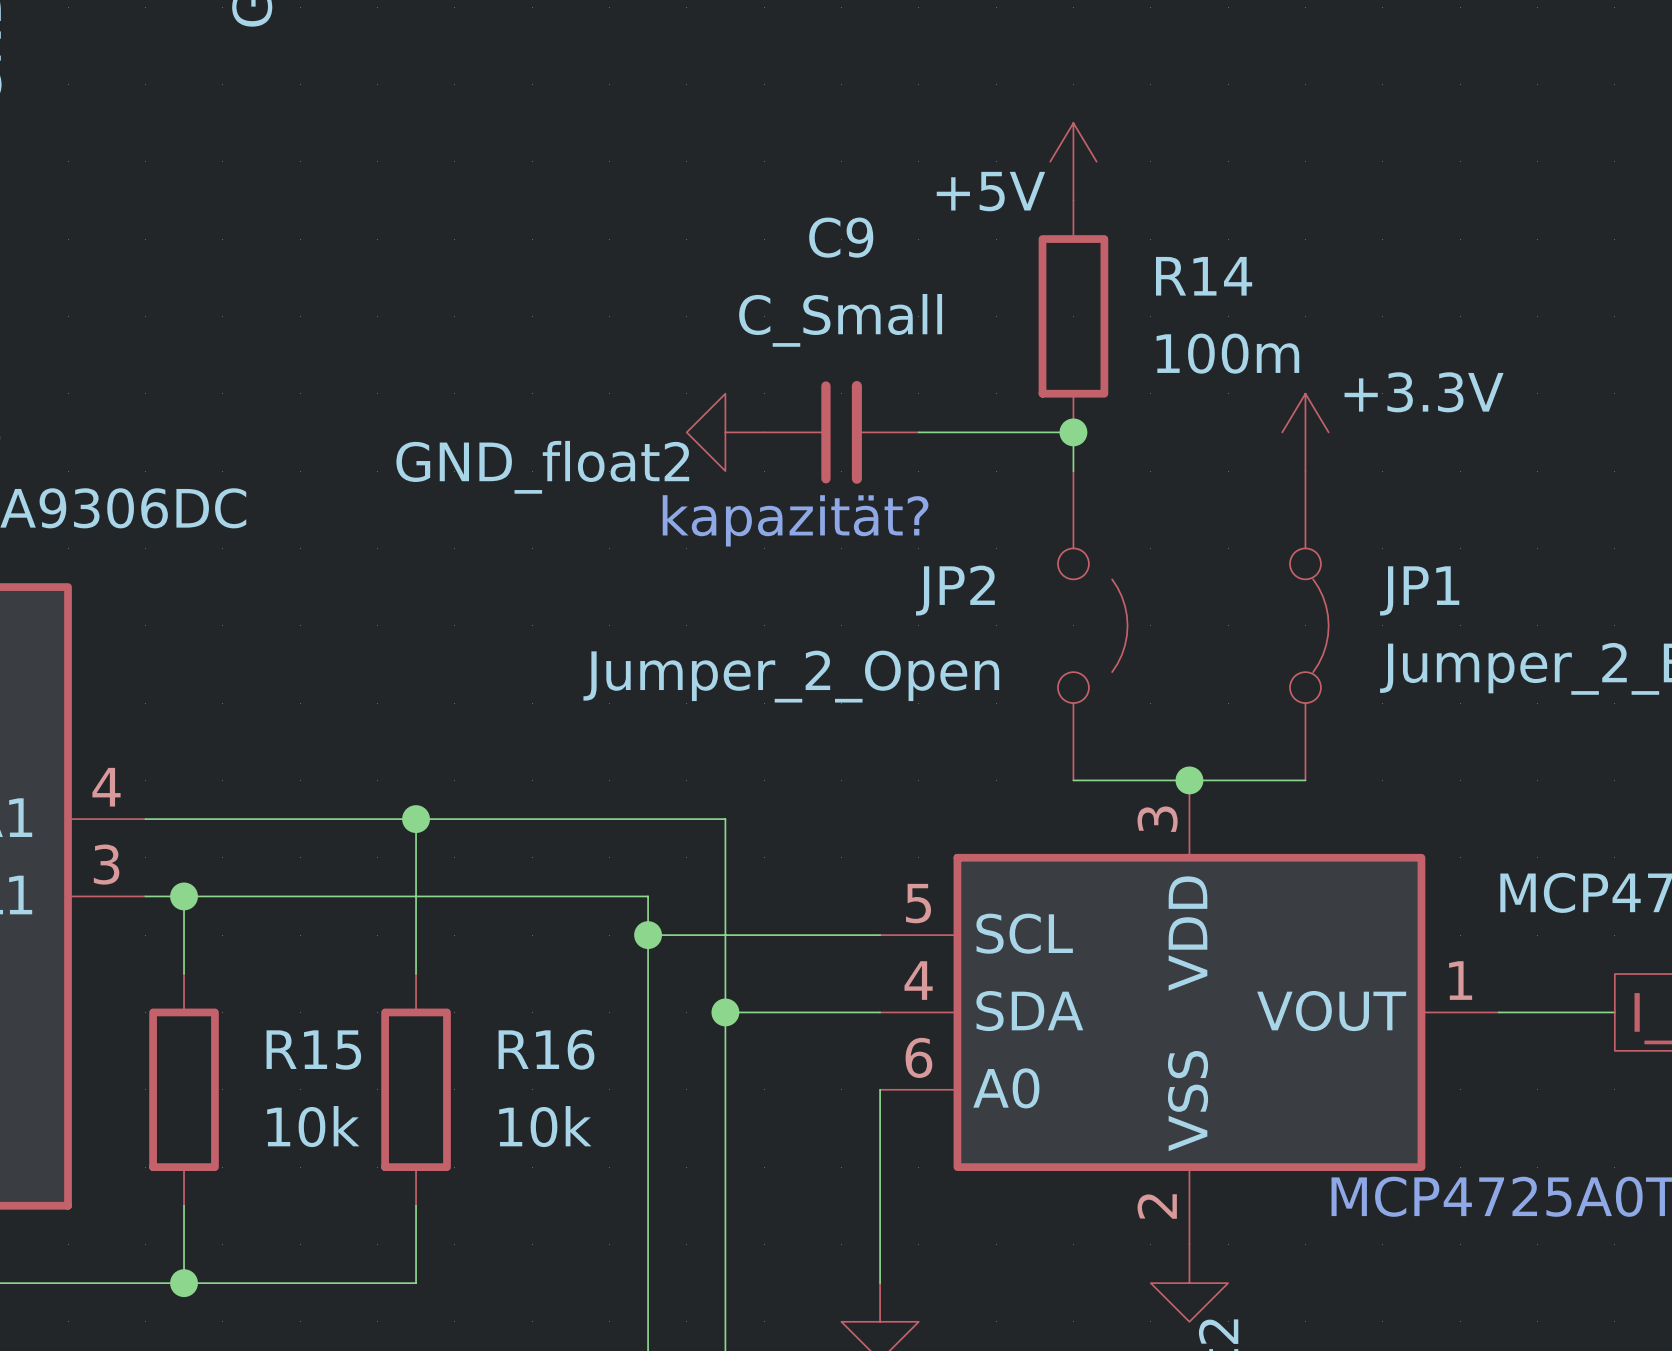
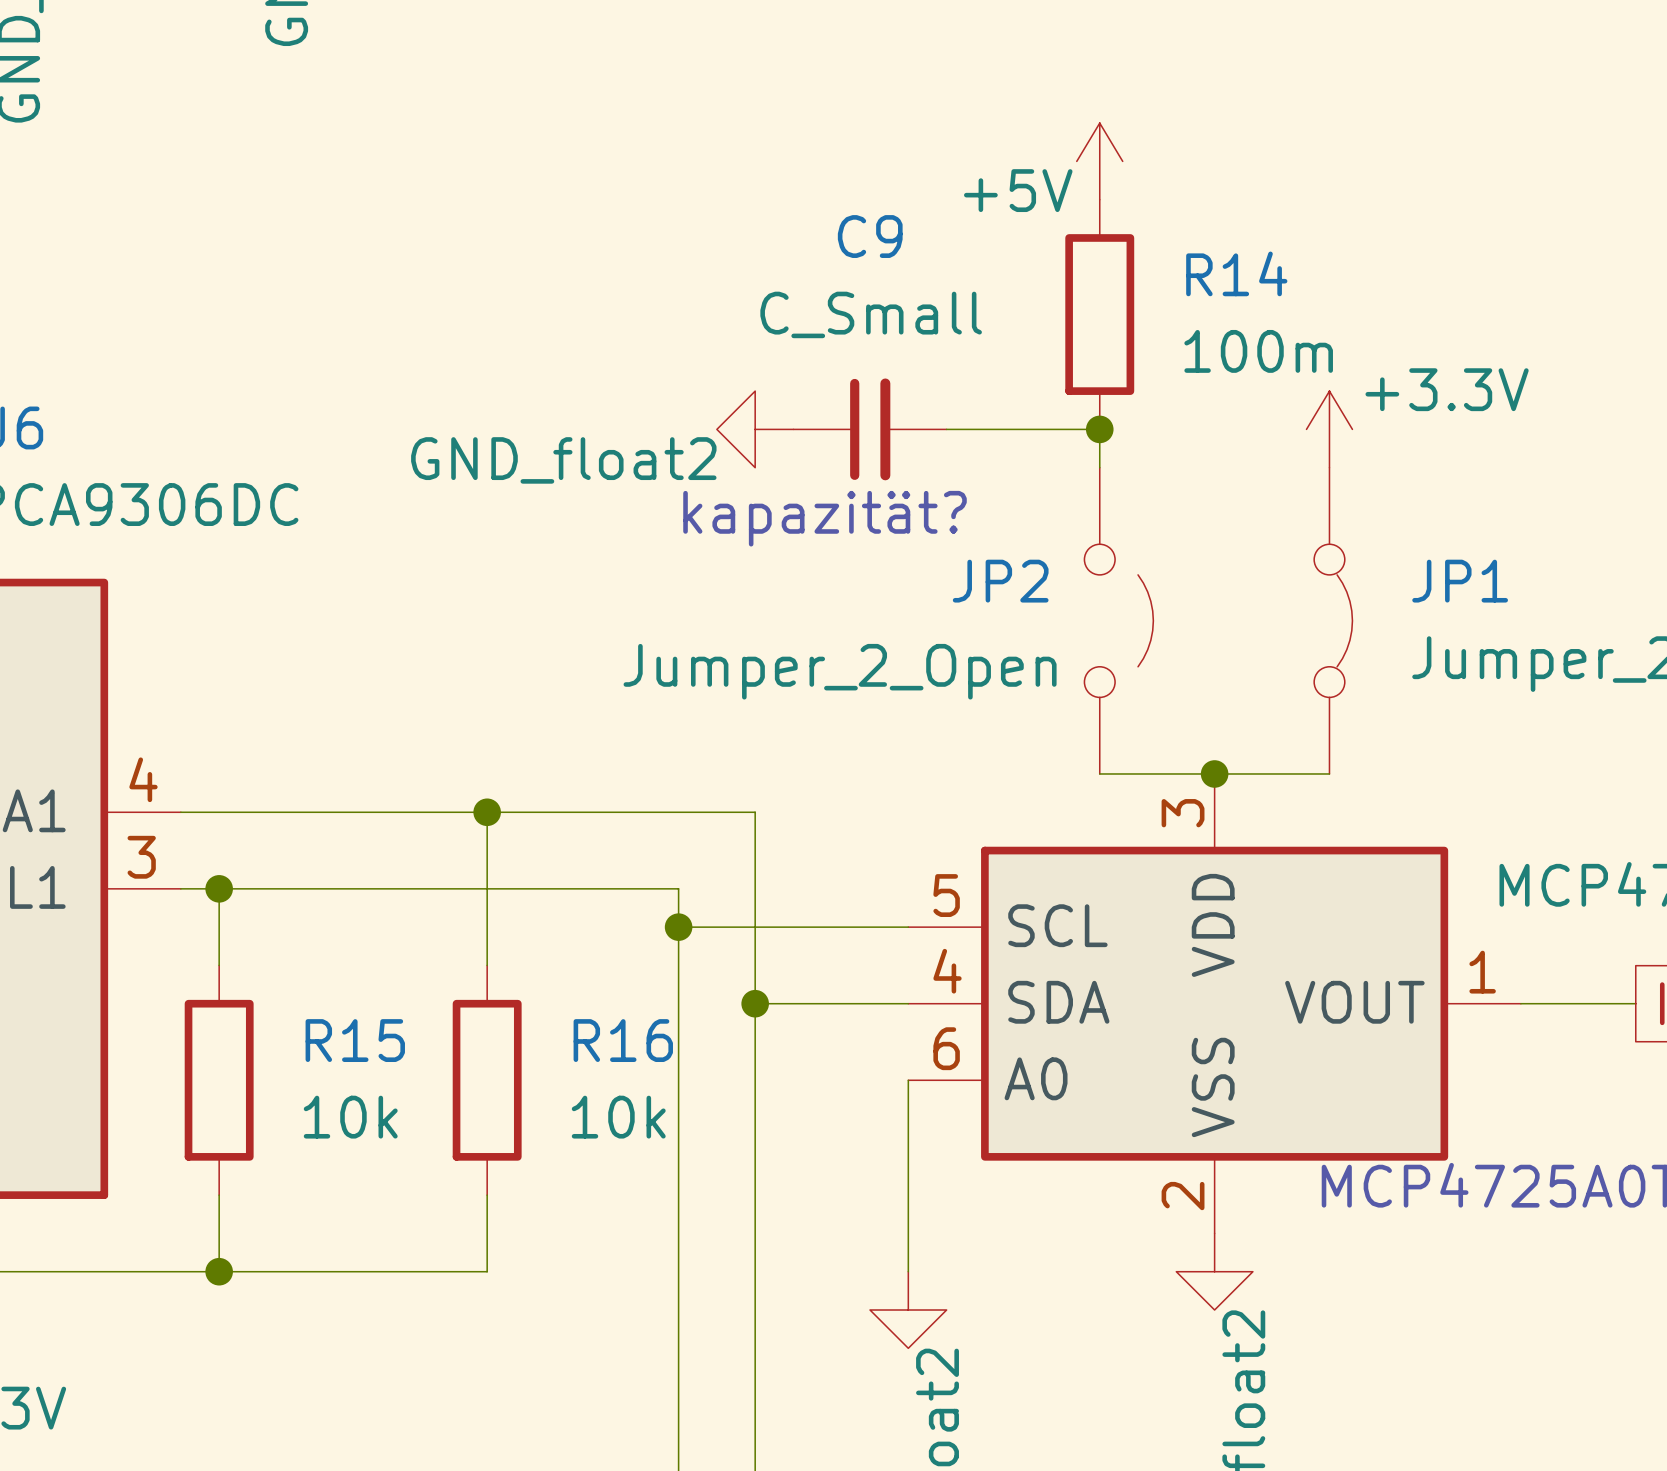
wire: (416, 819) (416, 973) -> (487, 812) (487, 965)
junction position: (416, 819) -> (487, 812)
R16 position: (416, 1089) -> (487, 1080)
wire: (416, 1205) (416, 1283) -> (487, 1195) (487, 1271) (448, 1271)

